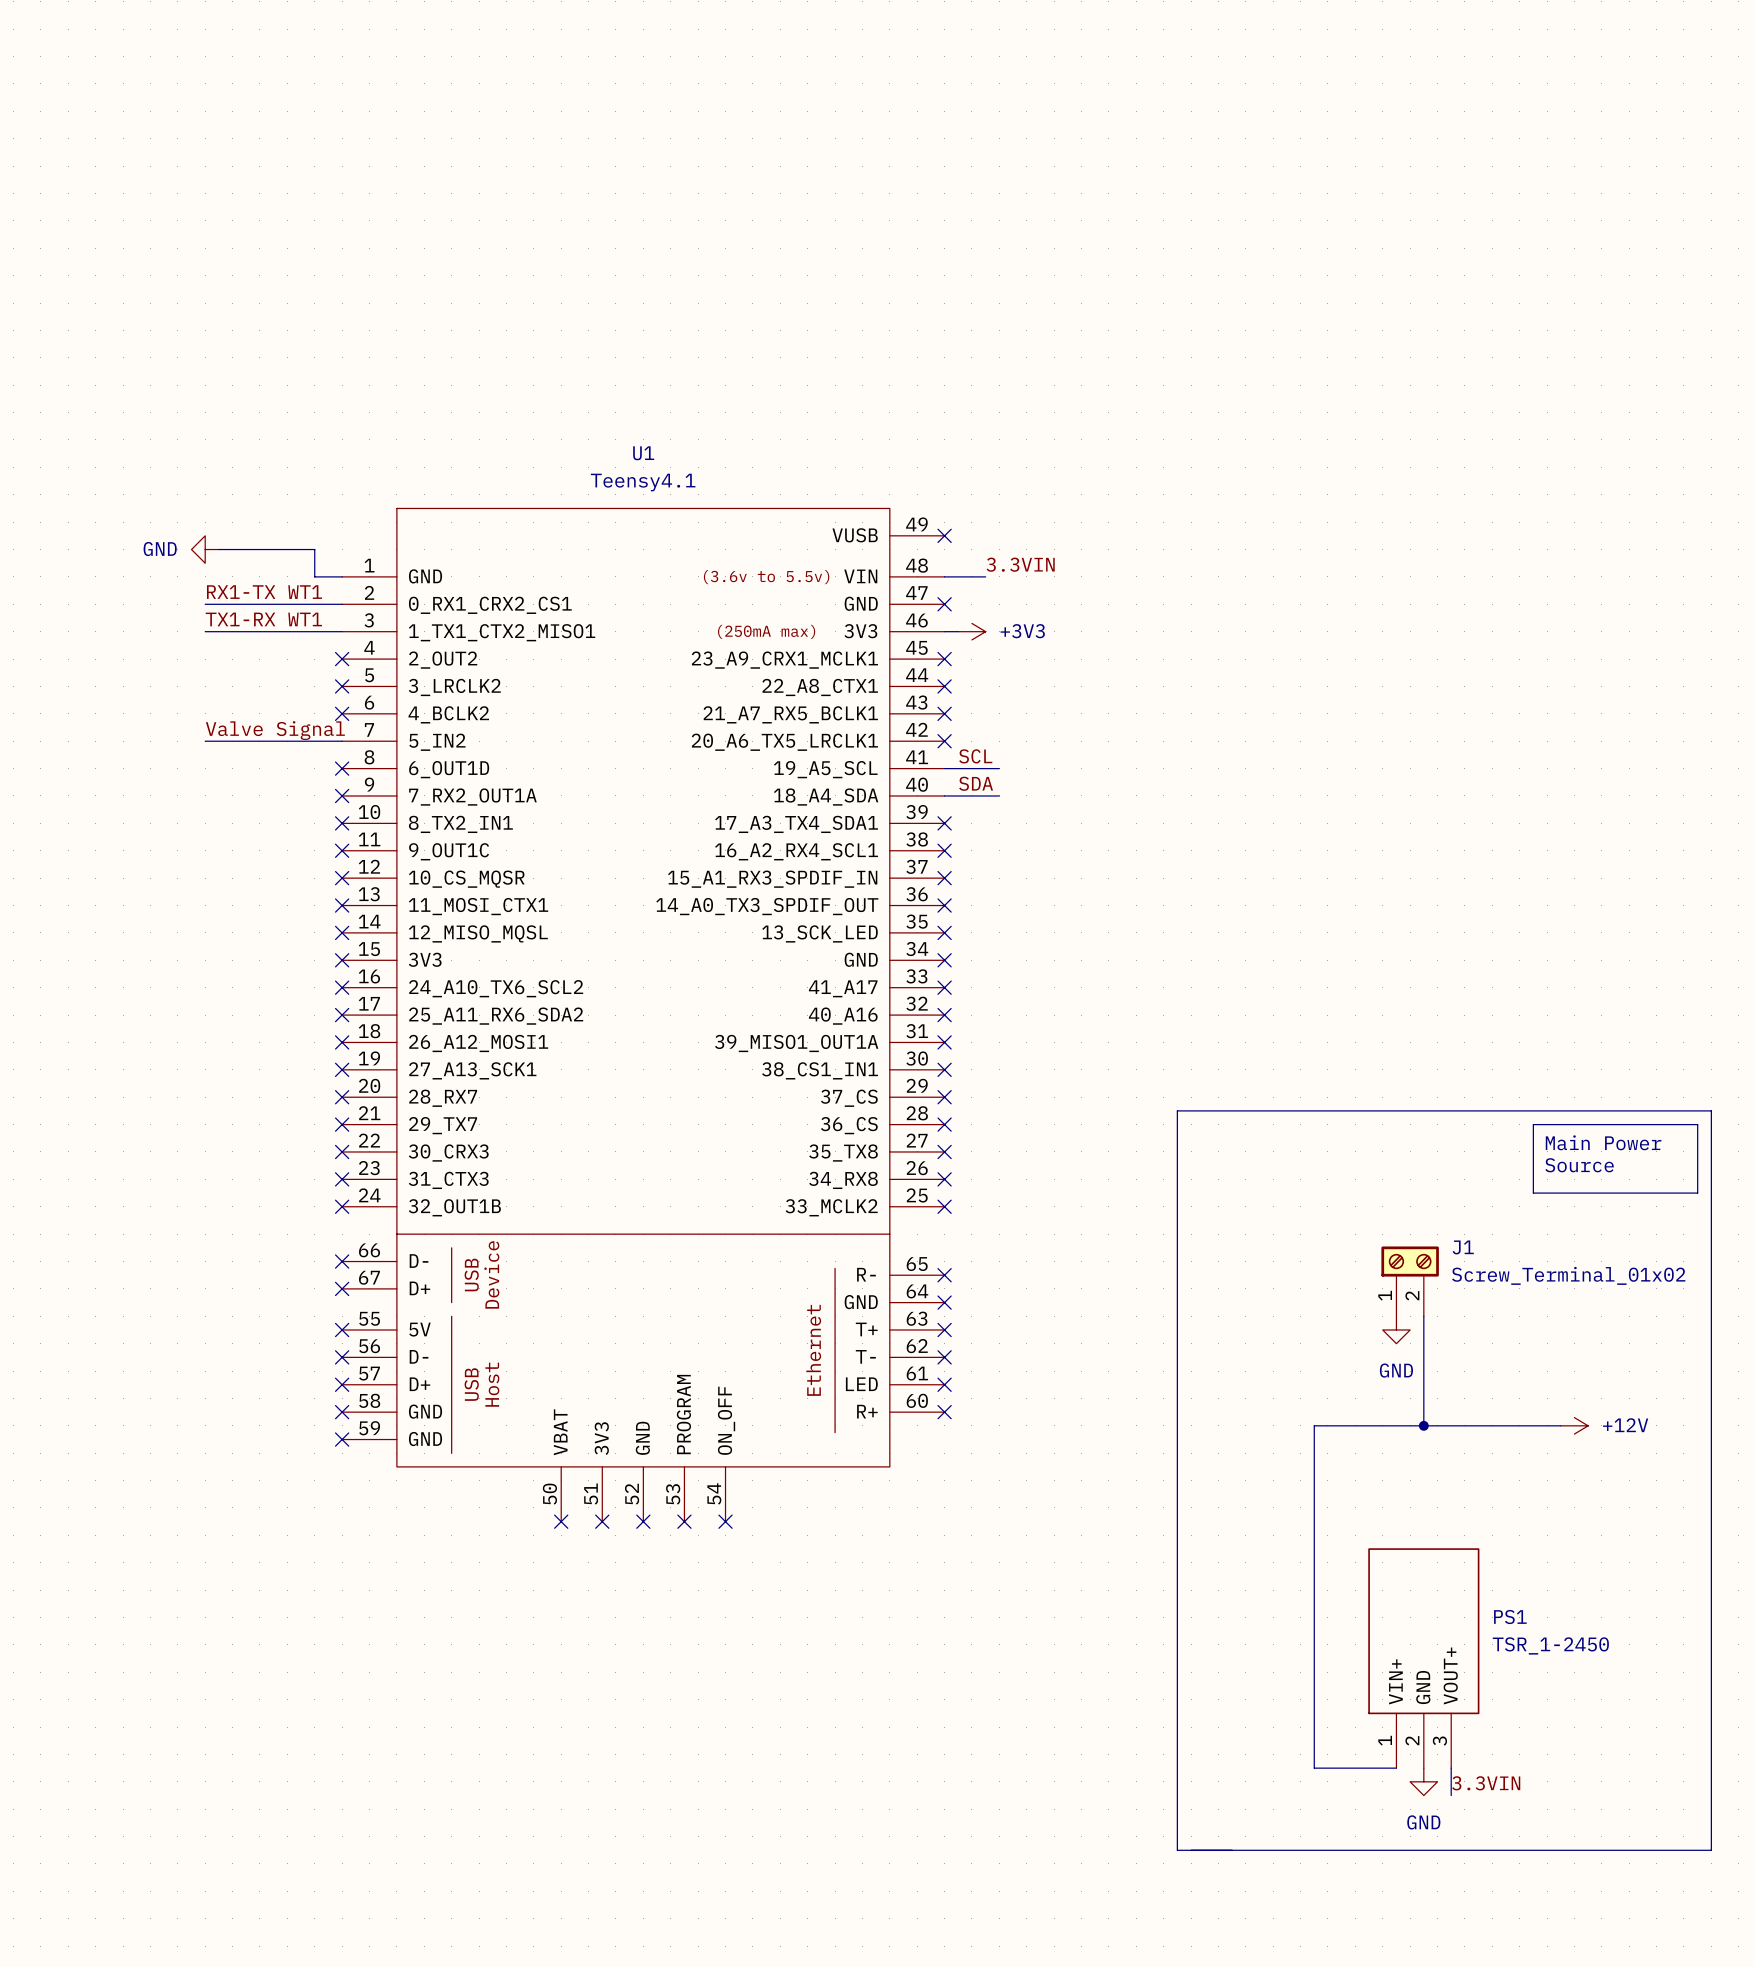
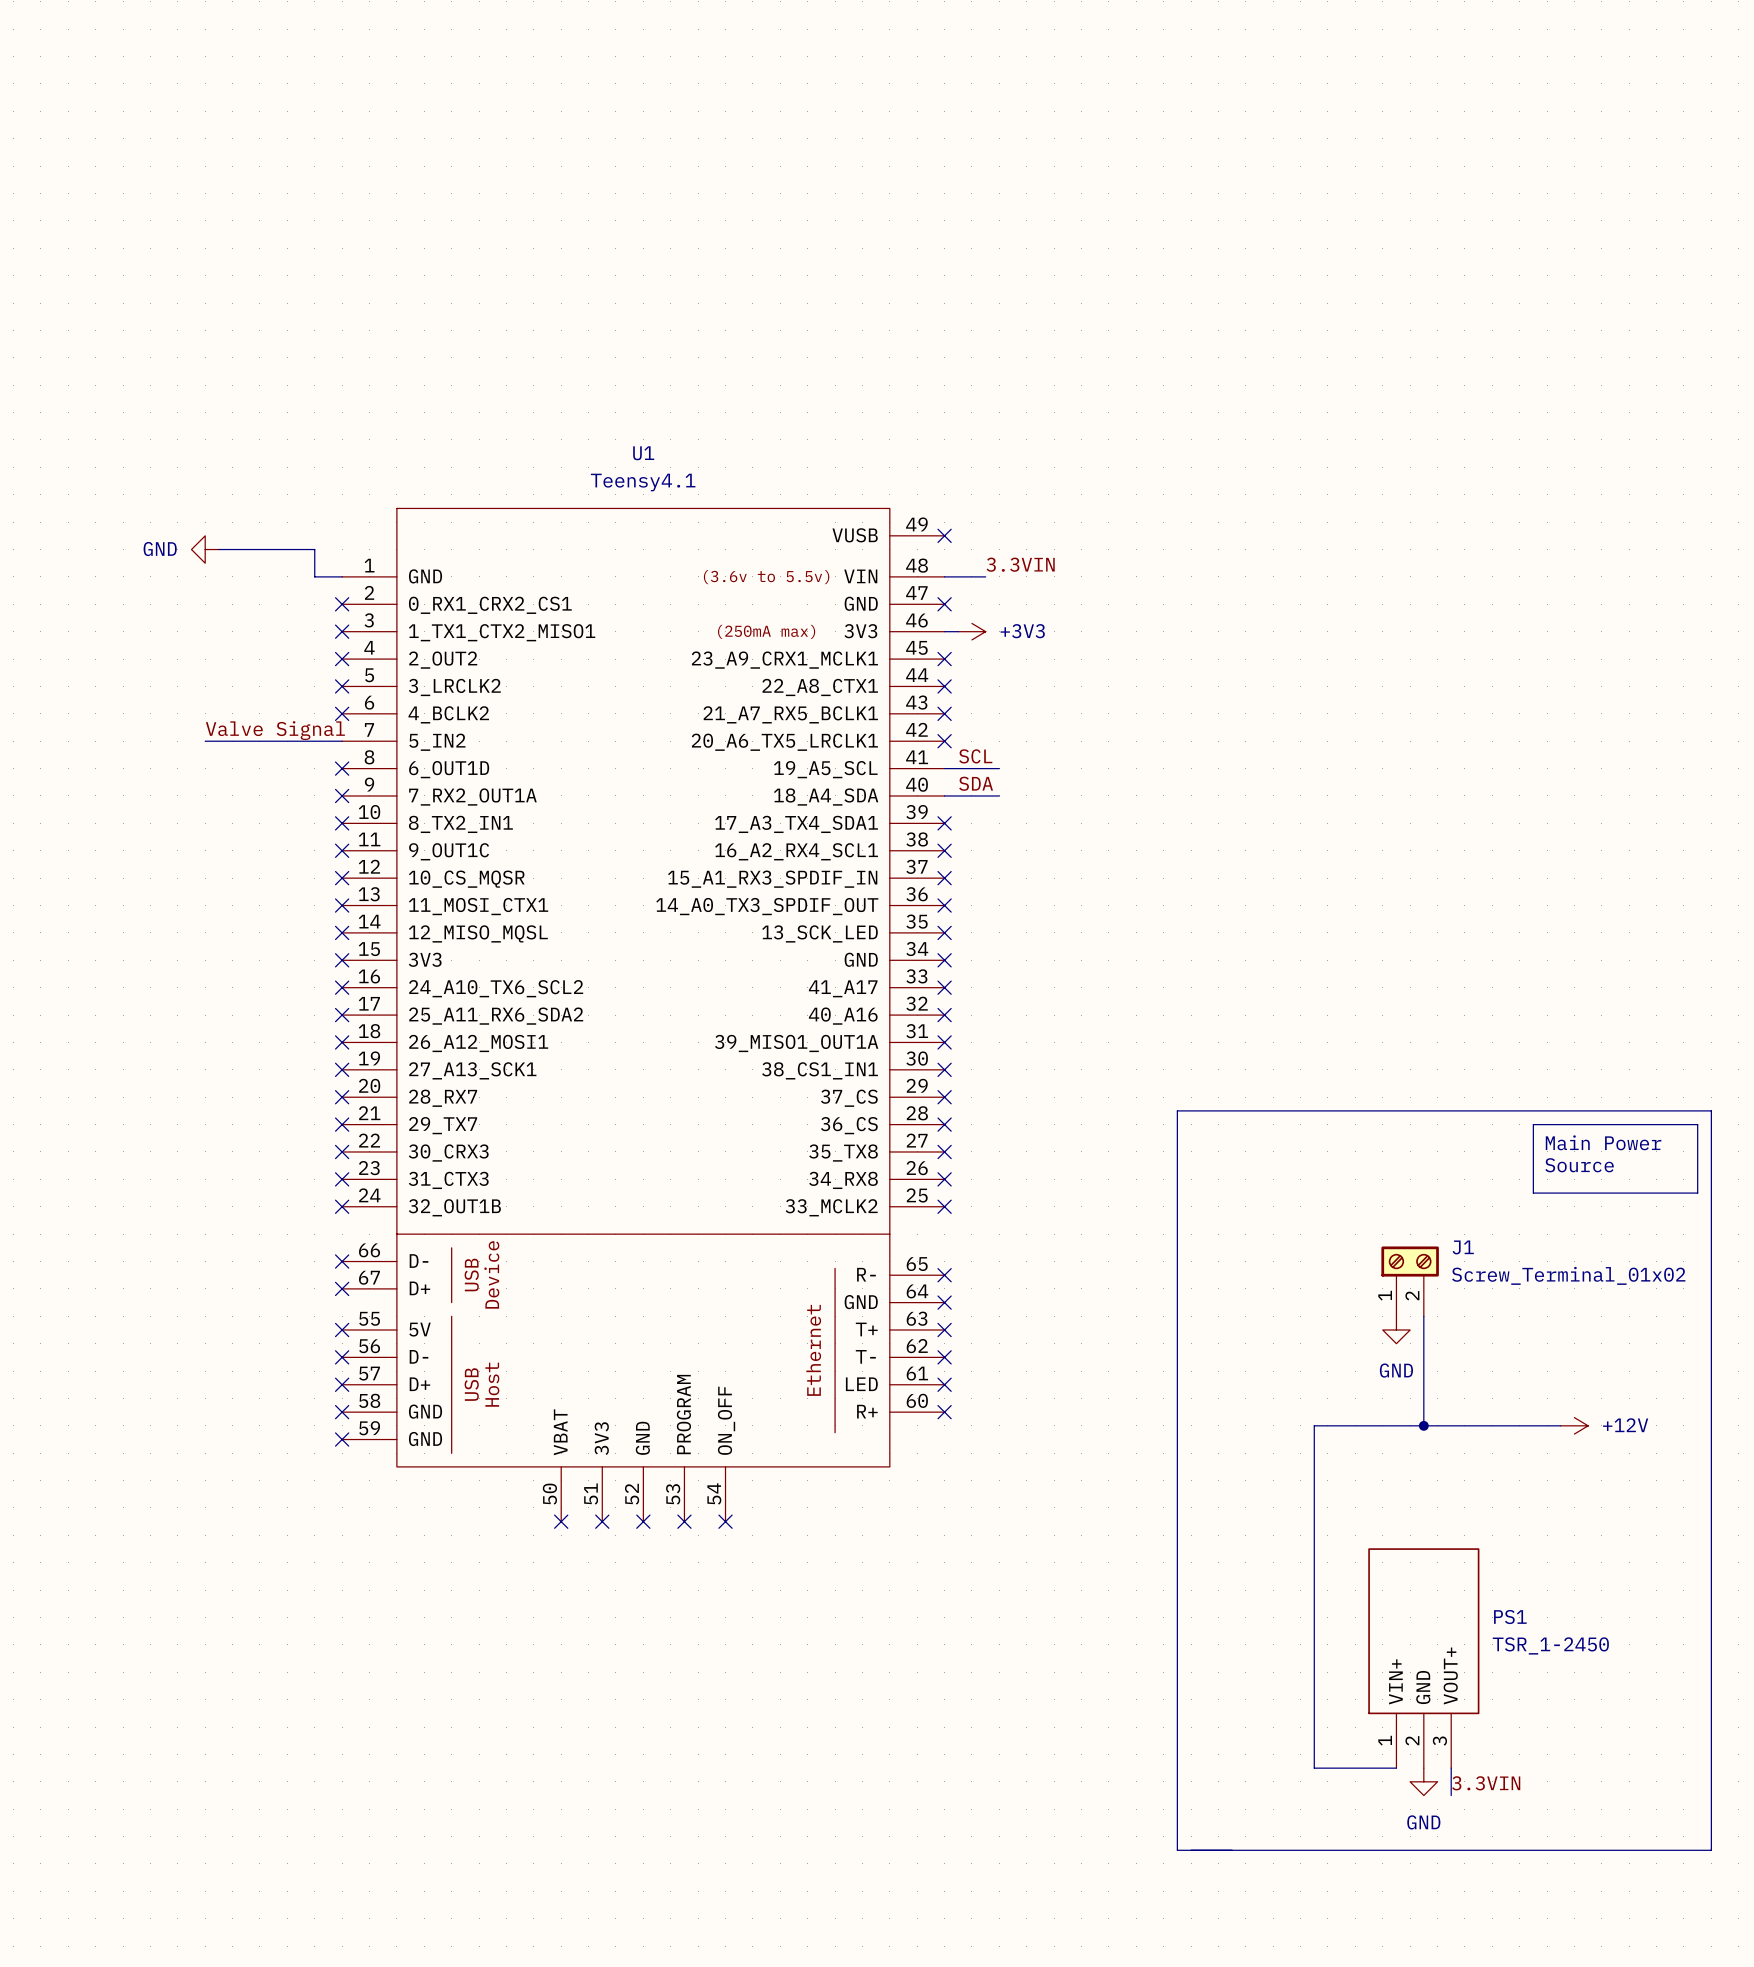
label: RX1-TX WT1 (264, 592) -> none
wire: (205, 604) (342, 604) -> none
no-connect mark: none -> (342, 604)
label: TX1-RX WT1 (263, 619) -> none
wire: (205, 631) (342, 631) -> none
no-connect mark: none -> (342, 631)

